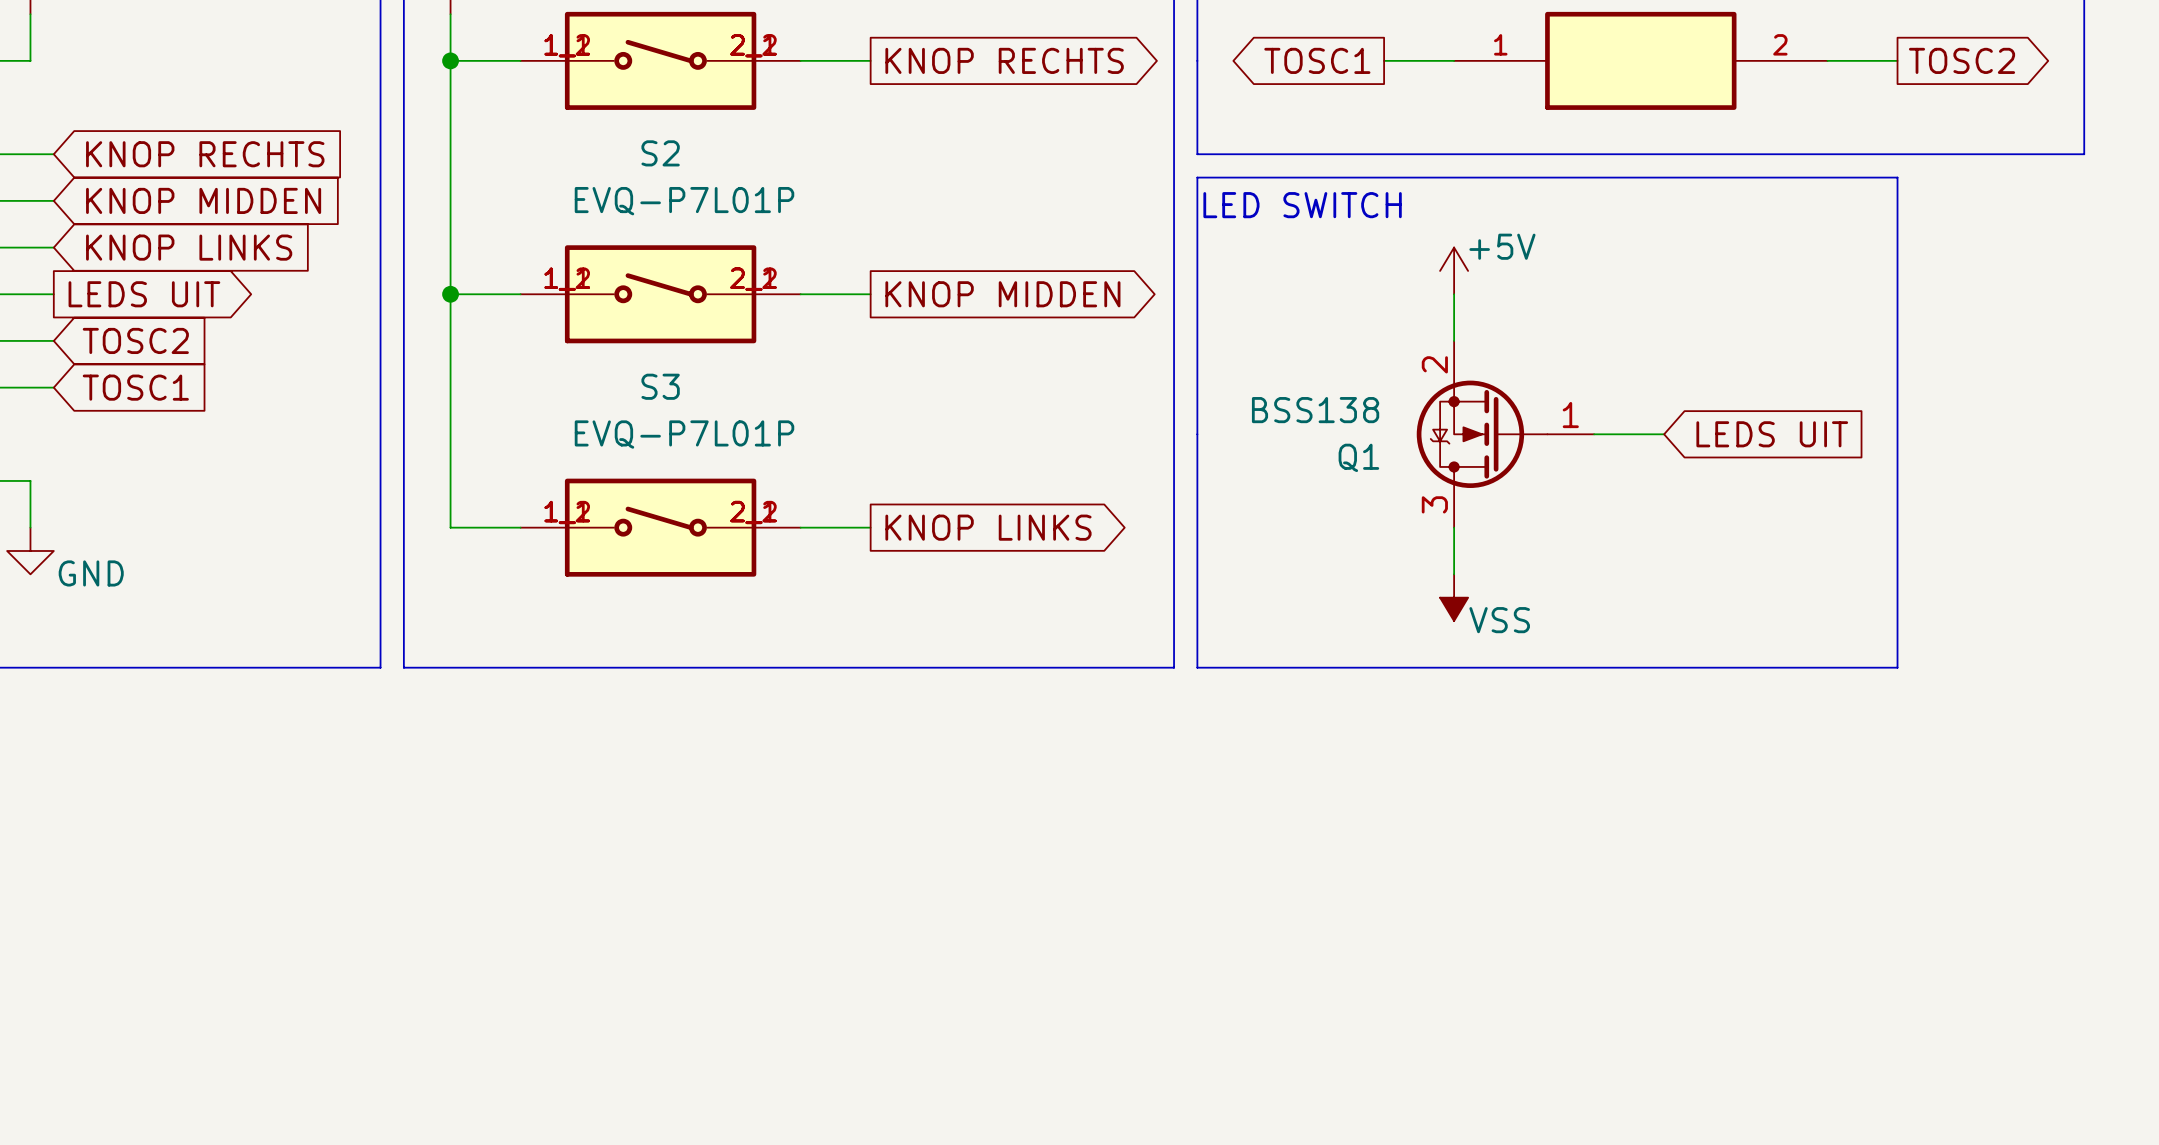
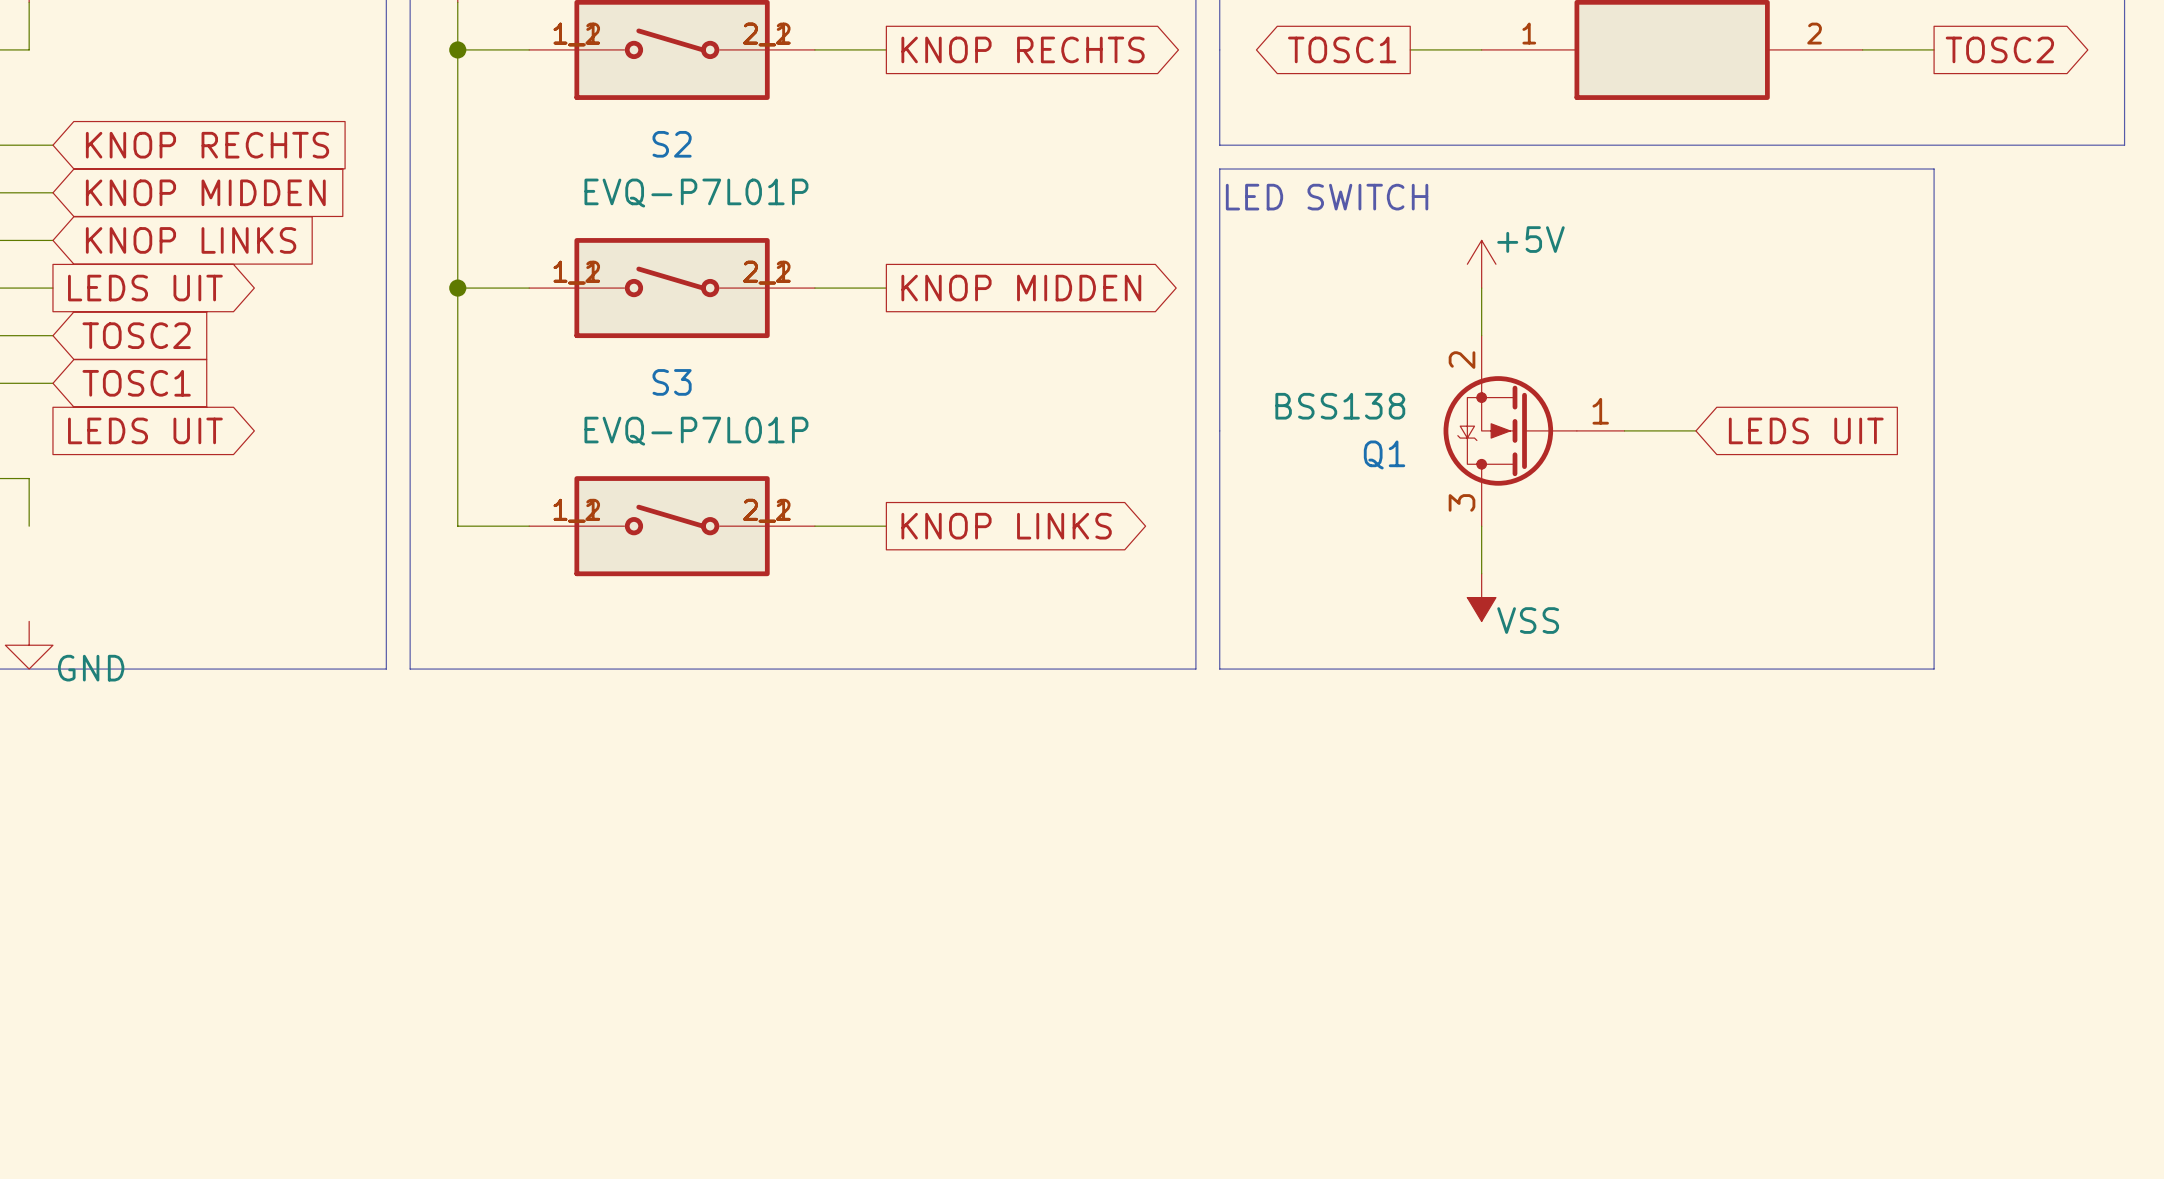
global label: none -> LEDS UIT (145, 430)
power symbol position: GND (30, 550) -> GND (29, 645)

